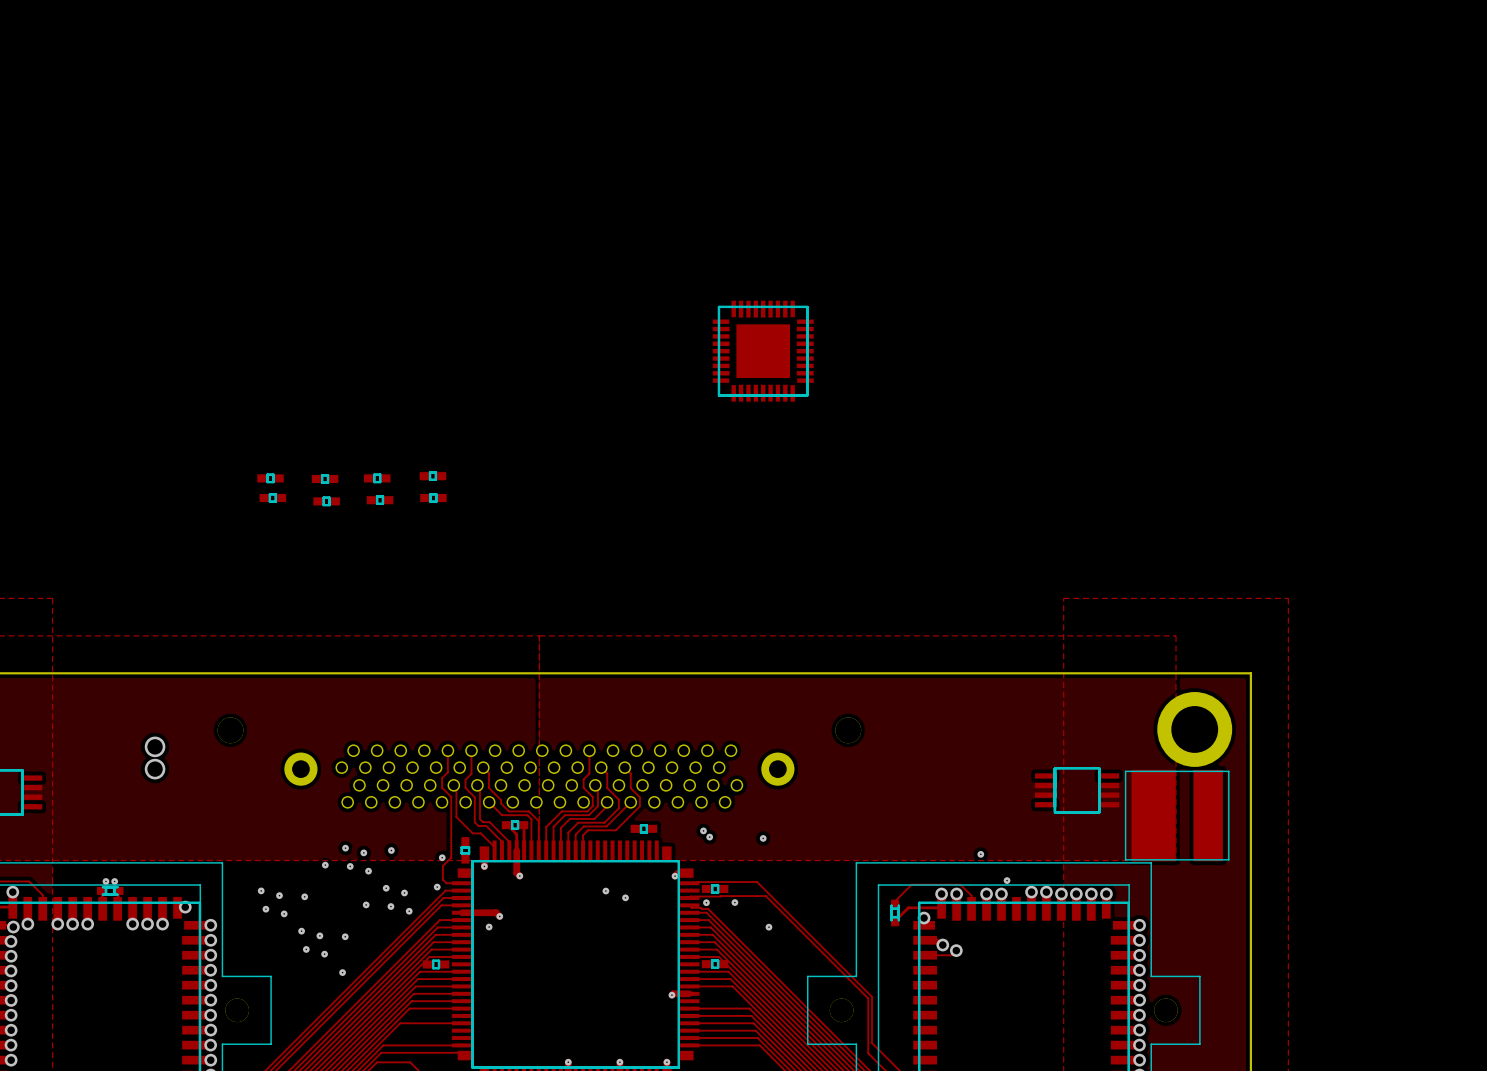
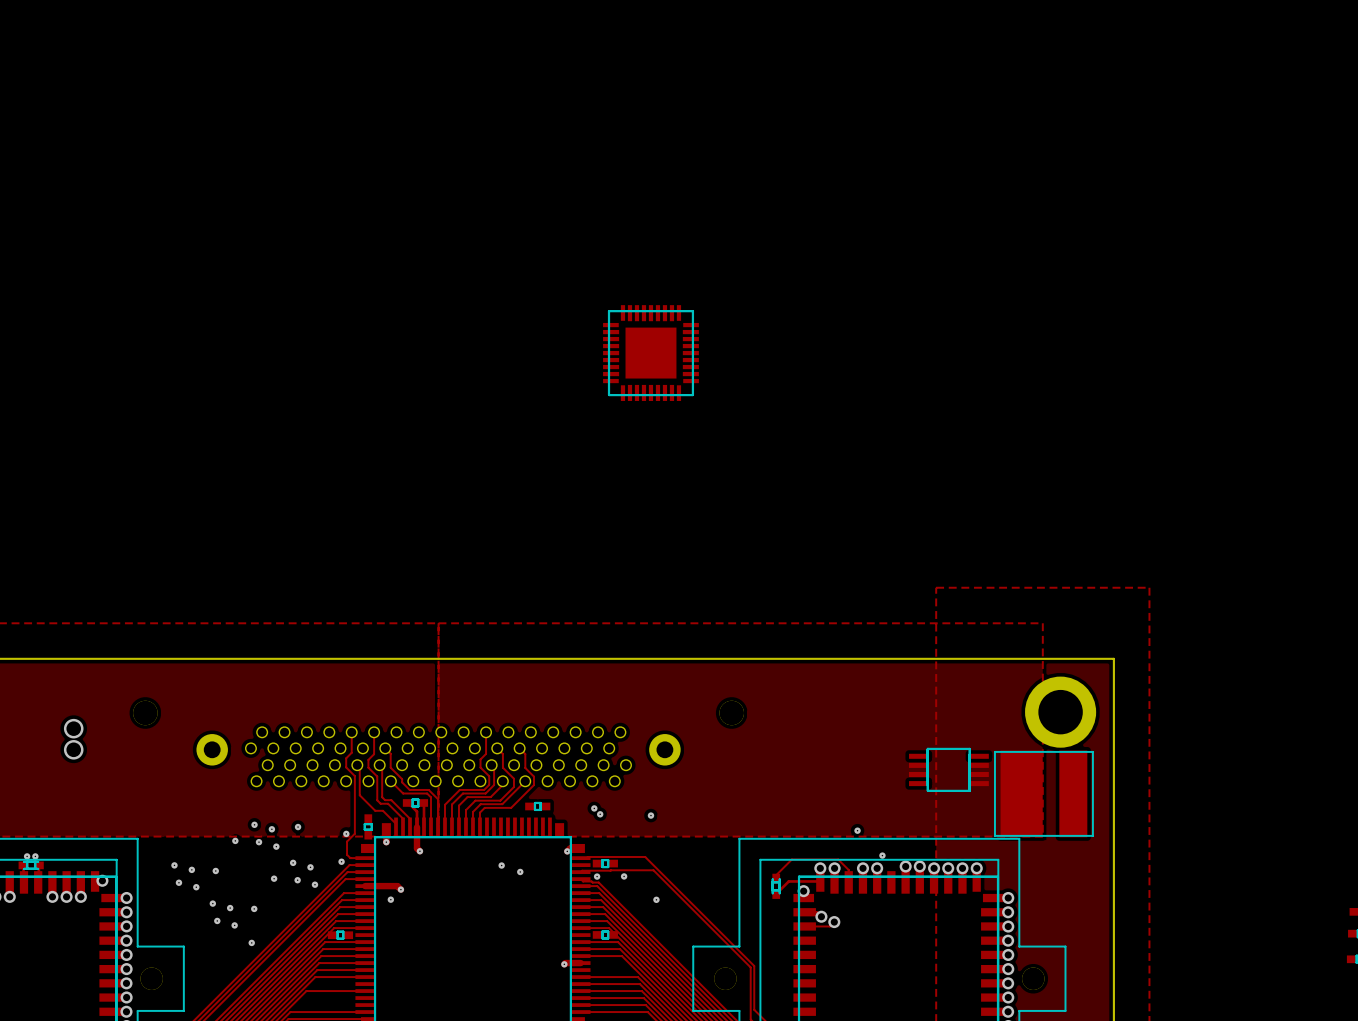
part: (432, 476) -> none
part: (270, 478) -> none
part: (325, 478) -> none
part: (377, 478) -> none
part: (272, 498) -> none
part: (433, 498) -> none
part: (380, 500) -> none
part: (326, 501) -> none

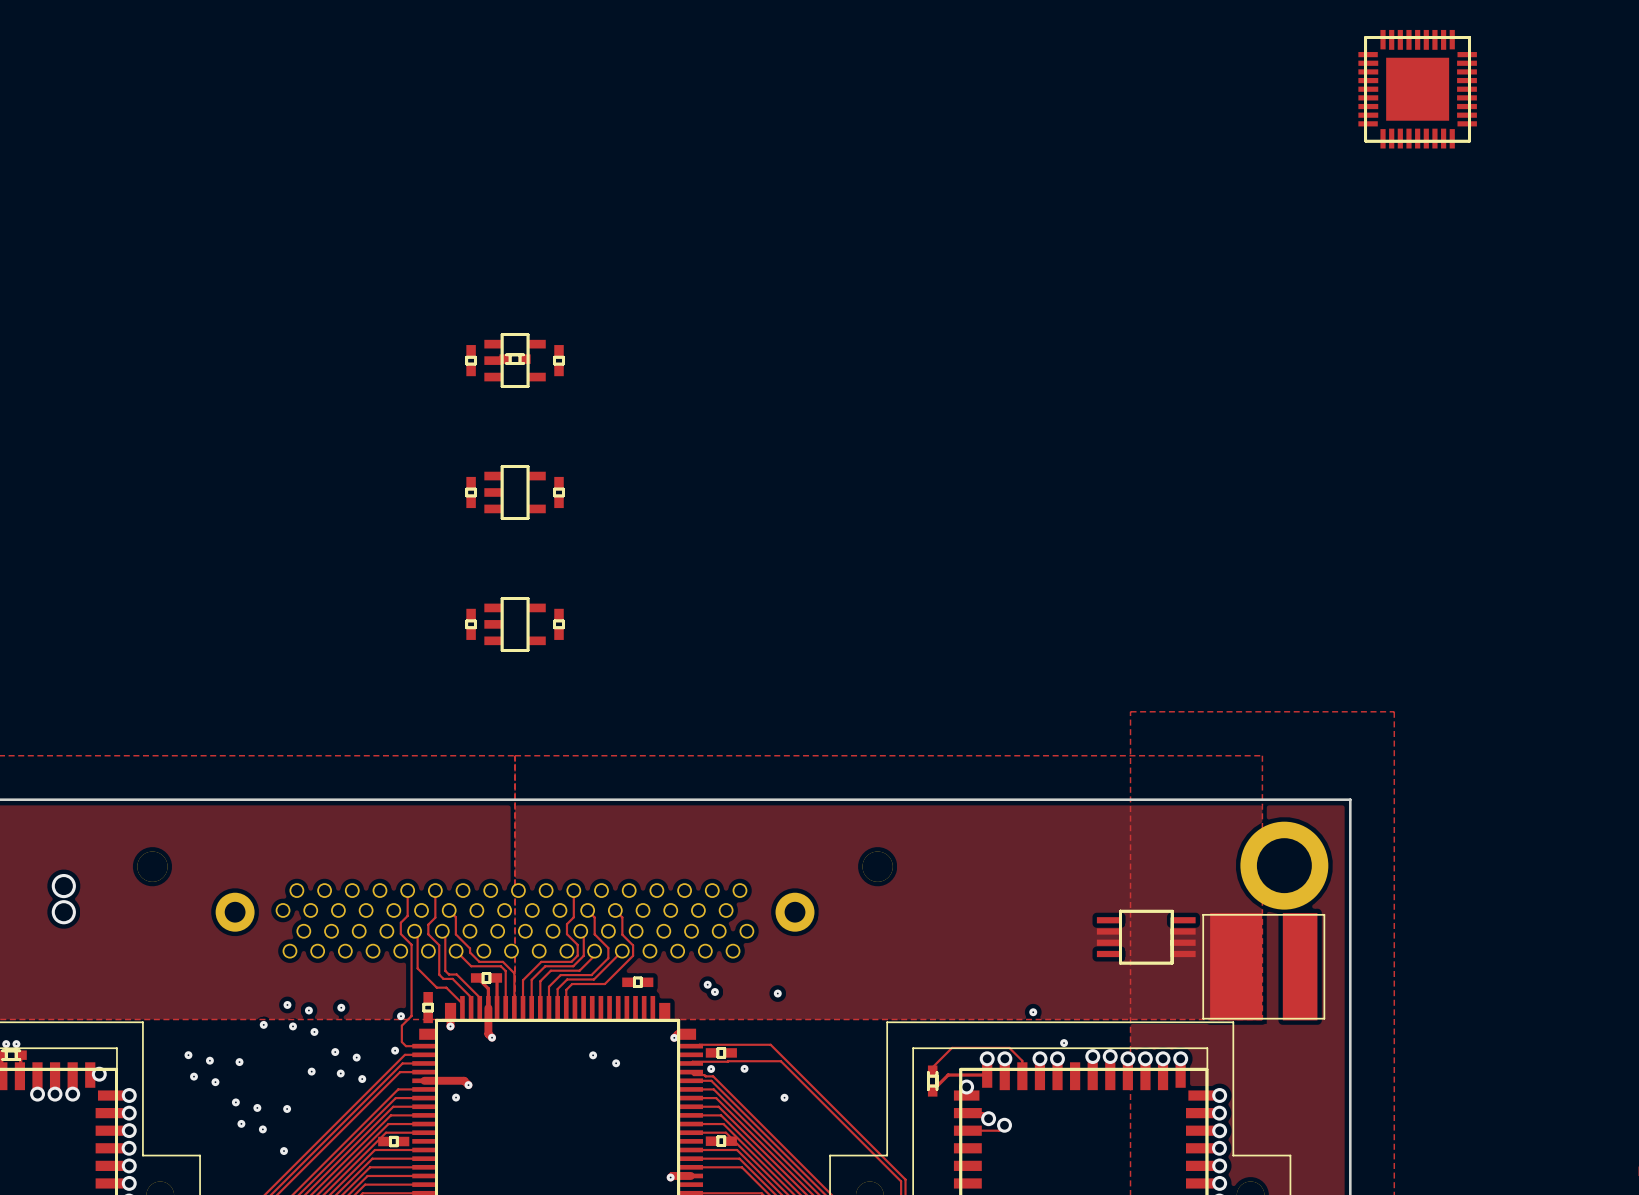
part: none -> (1417, 89)
part: none -> (515, 359)
part: none -> (471, 360)
part: none -> (515, 360)
part: none -> (559, 360)
part: (650, 353) -> none
part: none -> (471, 492)
part: none -> (515, 492)
part: none -> (559, 492)
part: none -> (471, 624)
part: none -> (515, 624)
part: none -> (559, 624)

